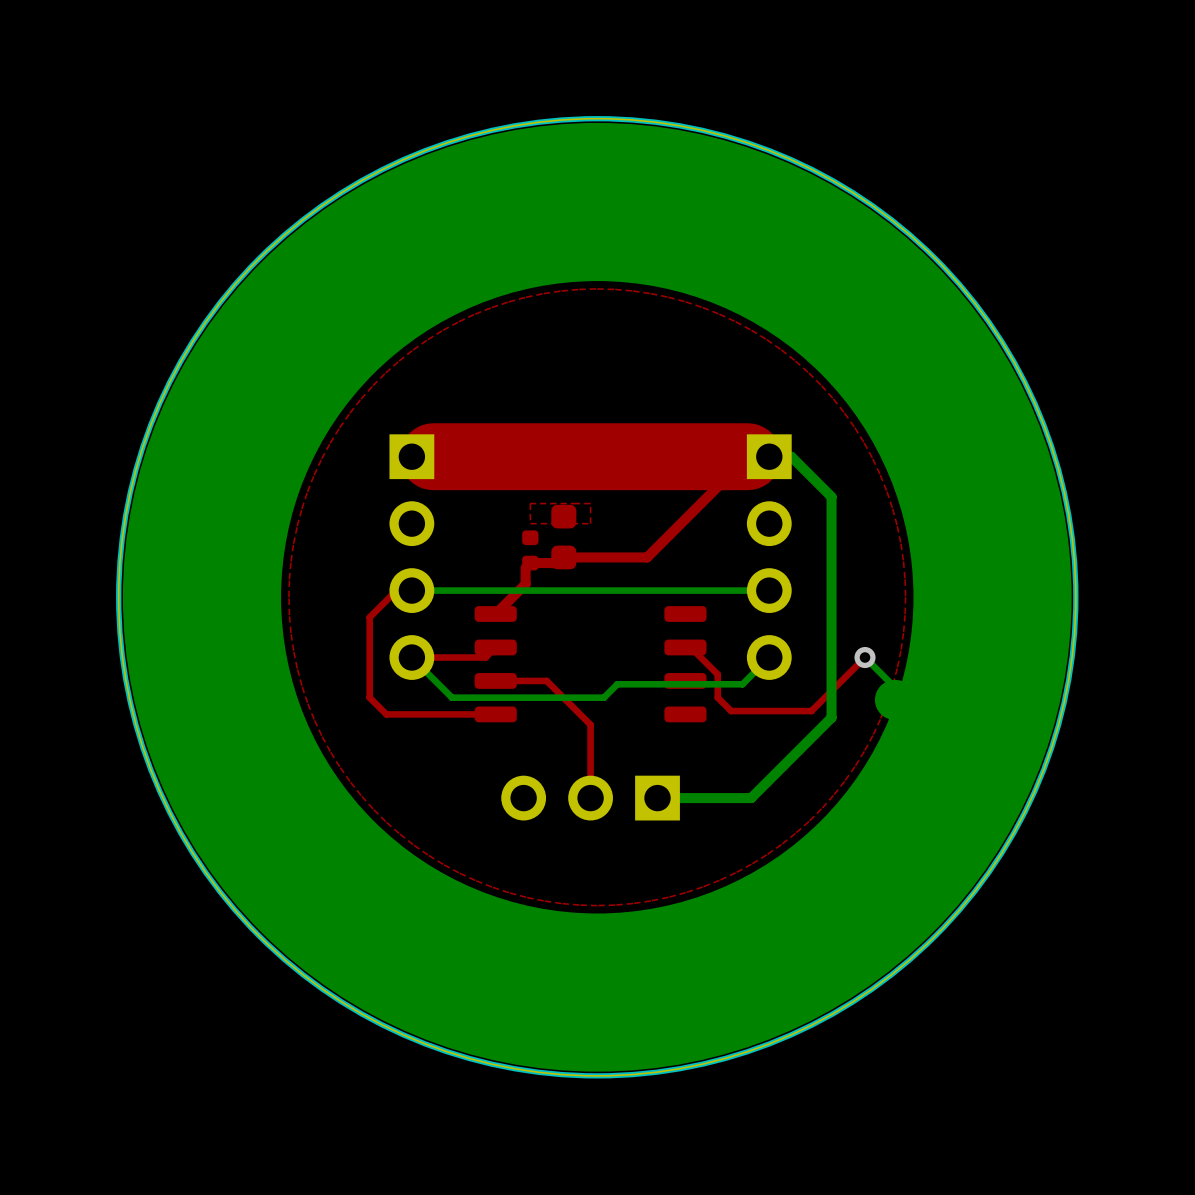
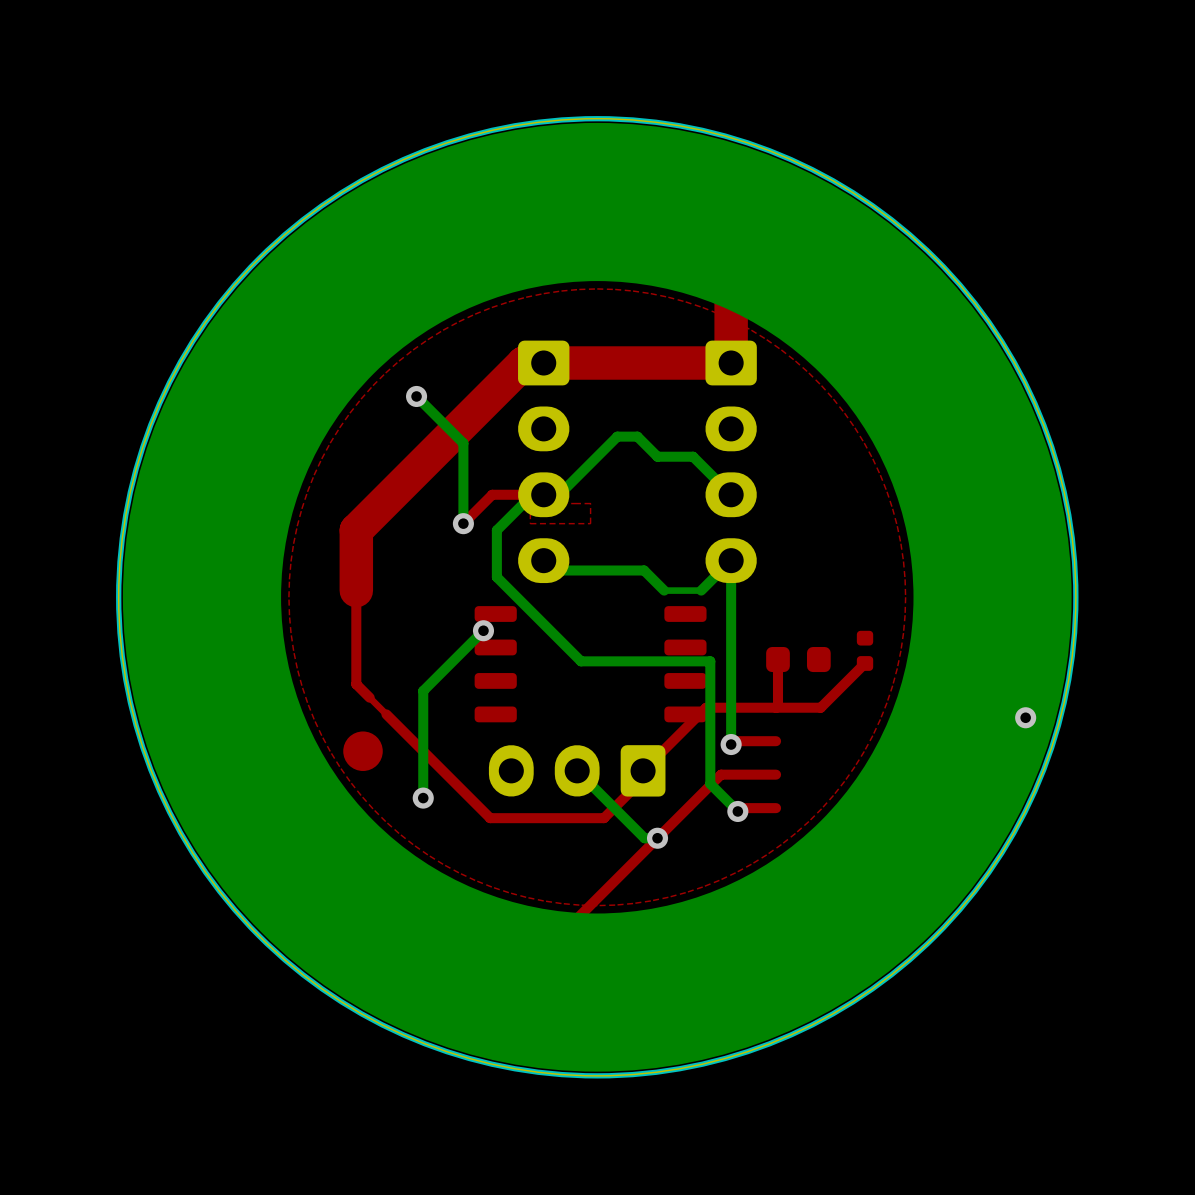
part footprint: [116, 116, 1079, 1079] -> [116, 116, 1079, 1079]
bottom track: none -> (416, 396) (463, 443) (463, 523)
via: none -> (416, 396)
top track: (433, 456) (747, 456) (647, 557) (563, 557) (558, 563) (530, 563) (525, 567) (525, 584) (495, 614) -> none
bottom track: (769, 456) (791, 456) (831, 496) (831, 717) (751, 798) (657, 798) -> none
part: none -> (543, 461)
part: none -> (731, 461)
top track: none -> (543, 494) (492, 494) (463, 523)
bottom track: none -> (731, 494) (693, 456) (657, 456) (637, 436) (617, 436) (559, 494) (532, 494) (496, 530) (496, 577) (581, 661) (710, 661) (710, 783) (737, 811)
via: none -> (463, 523)
part rotation: 0° (563, 537) -> 90° clockwise (798, 659)
part position: (563, 537) -> (798, 659)
part position: (530, 550) -> (865, 650)
part: (411, 557) -> none
part: (769, 557) -> none
top track: (411, 590) (396, 590) (369, 617) (369, 697) -> (744, 209) (731, 222) (731, 363) (523, 363) (356, 530) (356, 684) (369, 697)
bottom track: (664, 590) (411, 590) -> (664, 590) (644, 570) (553, 570) (543, 560)
bottom track: (769, 590) (701, 590) -> (731, 744) (731, 560) (701, 590)
bottom track: none -> (483, 630) (423, 690) (423, 798)
via: none -> (483, 630)
top track: (495, 647) (485, 657) (433, 657) -> none
top track: (685, 647) (690, 647) (717, 674) (717, 697) (731, 711) (811, 711) (865, 657) -> none
bottom track: (769, 657) (742, 684) (617, 684) (603, 697) (452, 697) (411, 657) -> none
bottom track: (865, 657) (892, 684) (887, 697) -> none
via: (865, 657) -> none
top track: none -> (778, 659) (778, 705) (776, 707)
top track: (495, 680) (546, 680) (590, 724) (590, 798) -> none
top track: (495, 714) (386, 714) -> (865, 663) (820, 707) (706, 707) (643, 770) (643, 779) (603, 818) (490, 818) (386, 714)
via: none -> (1025, 717)
top track: none -> (776, 741) (734, 741) (731, 744)
via: none -> (731, 744)
part: none -> (363, 751)
bottom track: none -> (577, 770) (644, 838) (657, 838)
part: none -> (577, 770)
top track: none -> (776, 774) (721, 774) (570, 925) (570, 965)
via: none -> (423, 798)
part: (590, 798) -> none
top track: none -> (776, 808) (741, 808) (737, 811)
via: none -> (737, 811)
via: none -> (657, 838)

